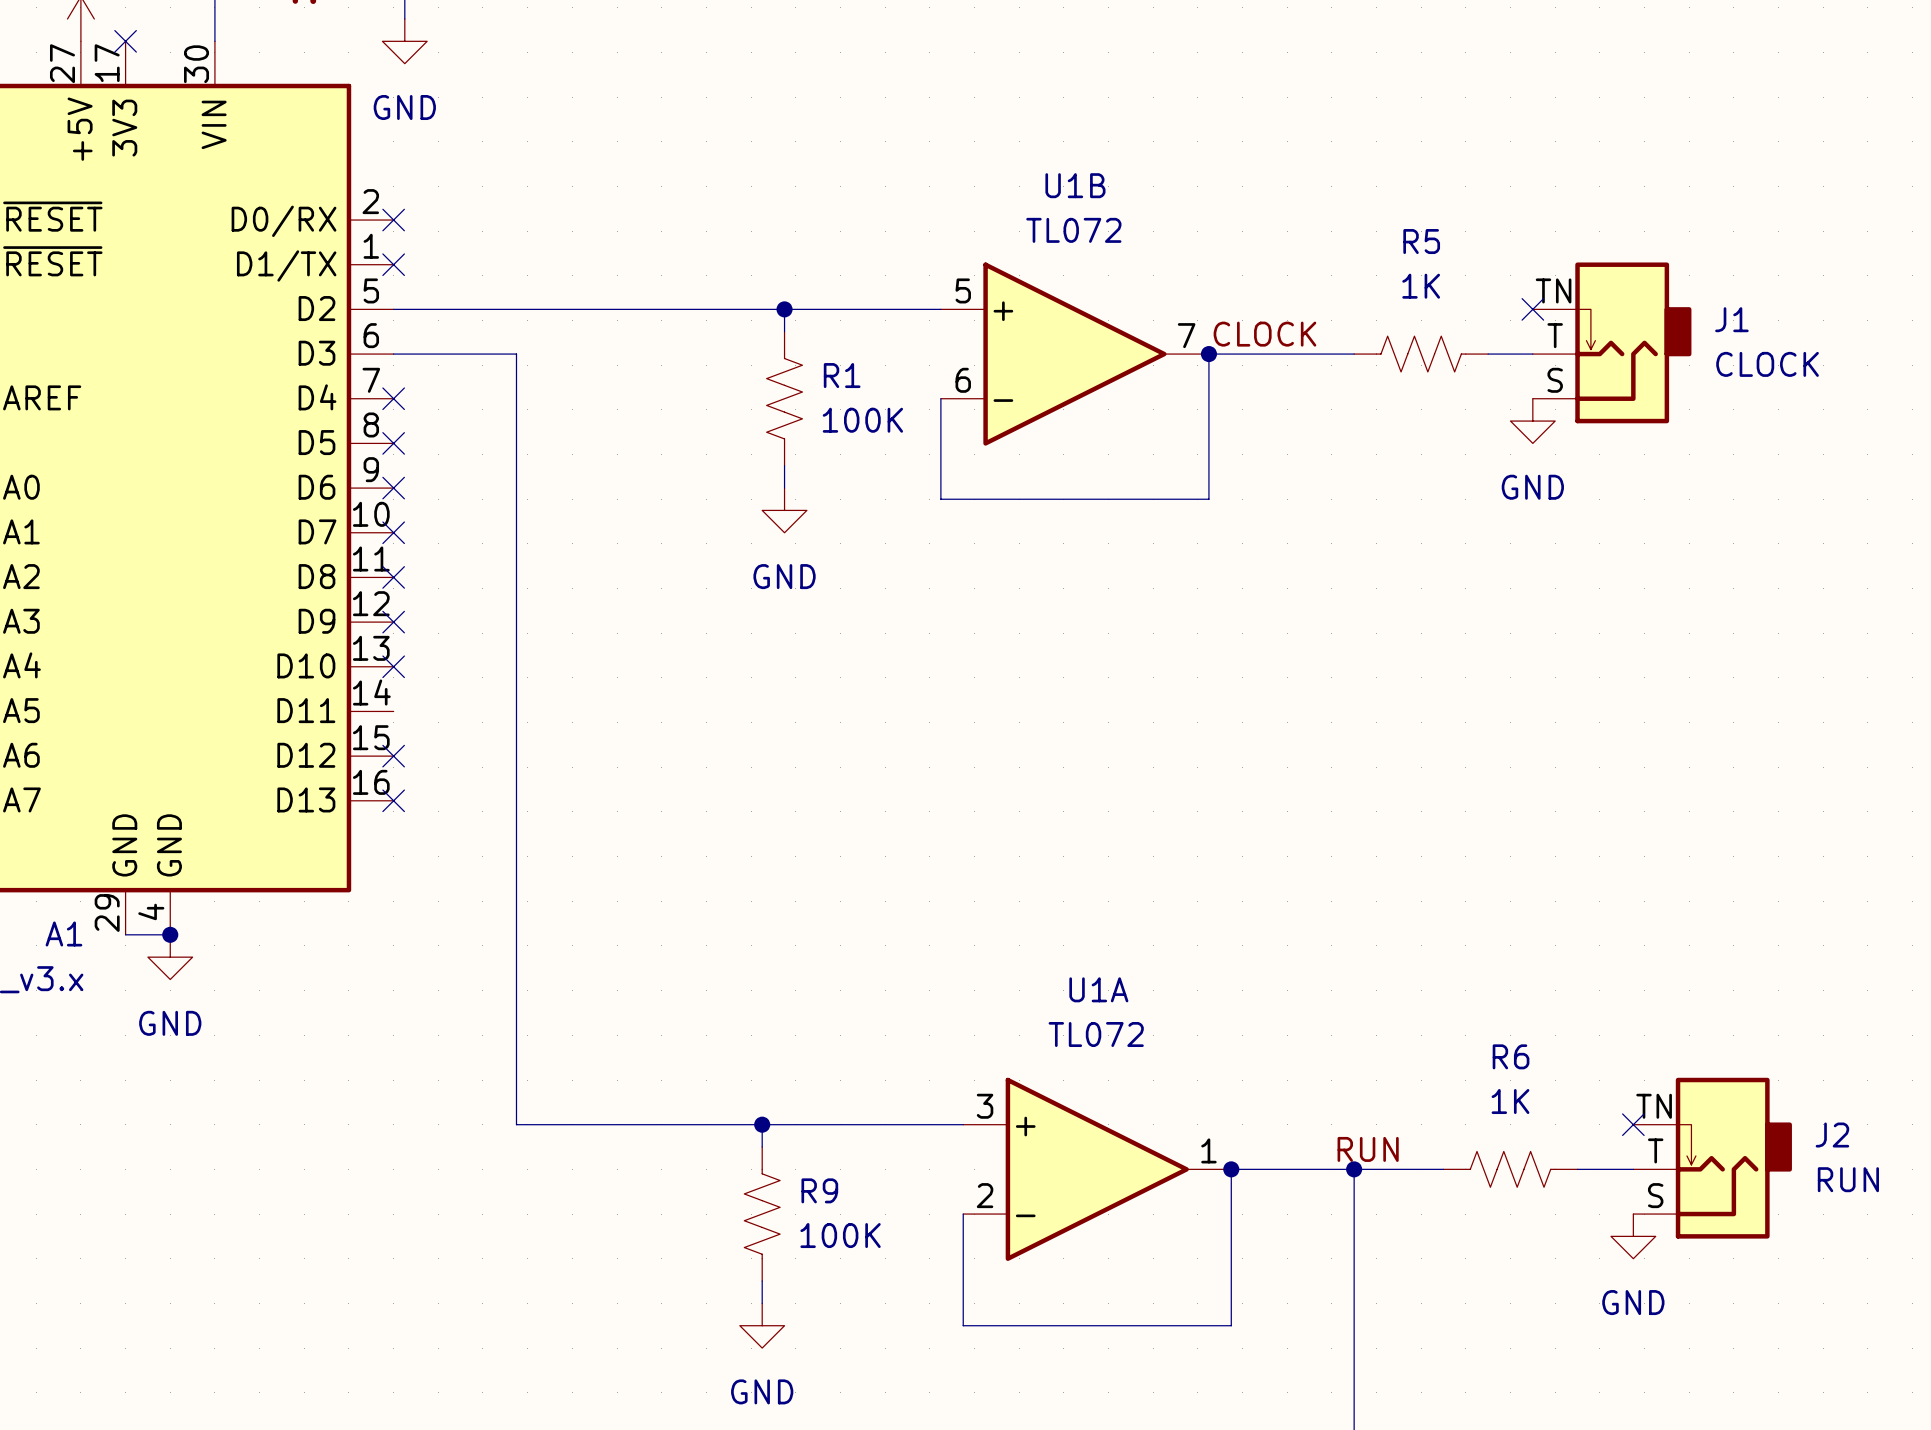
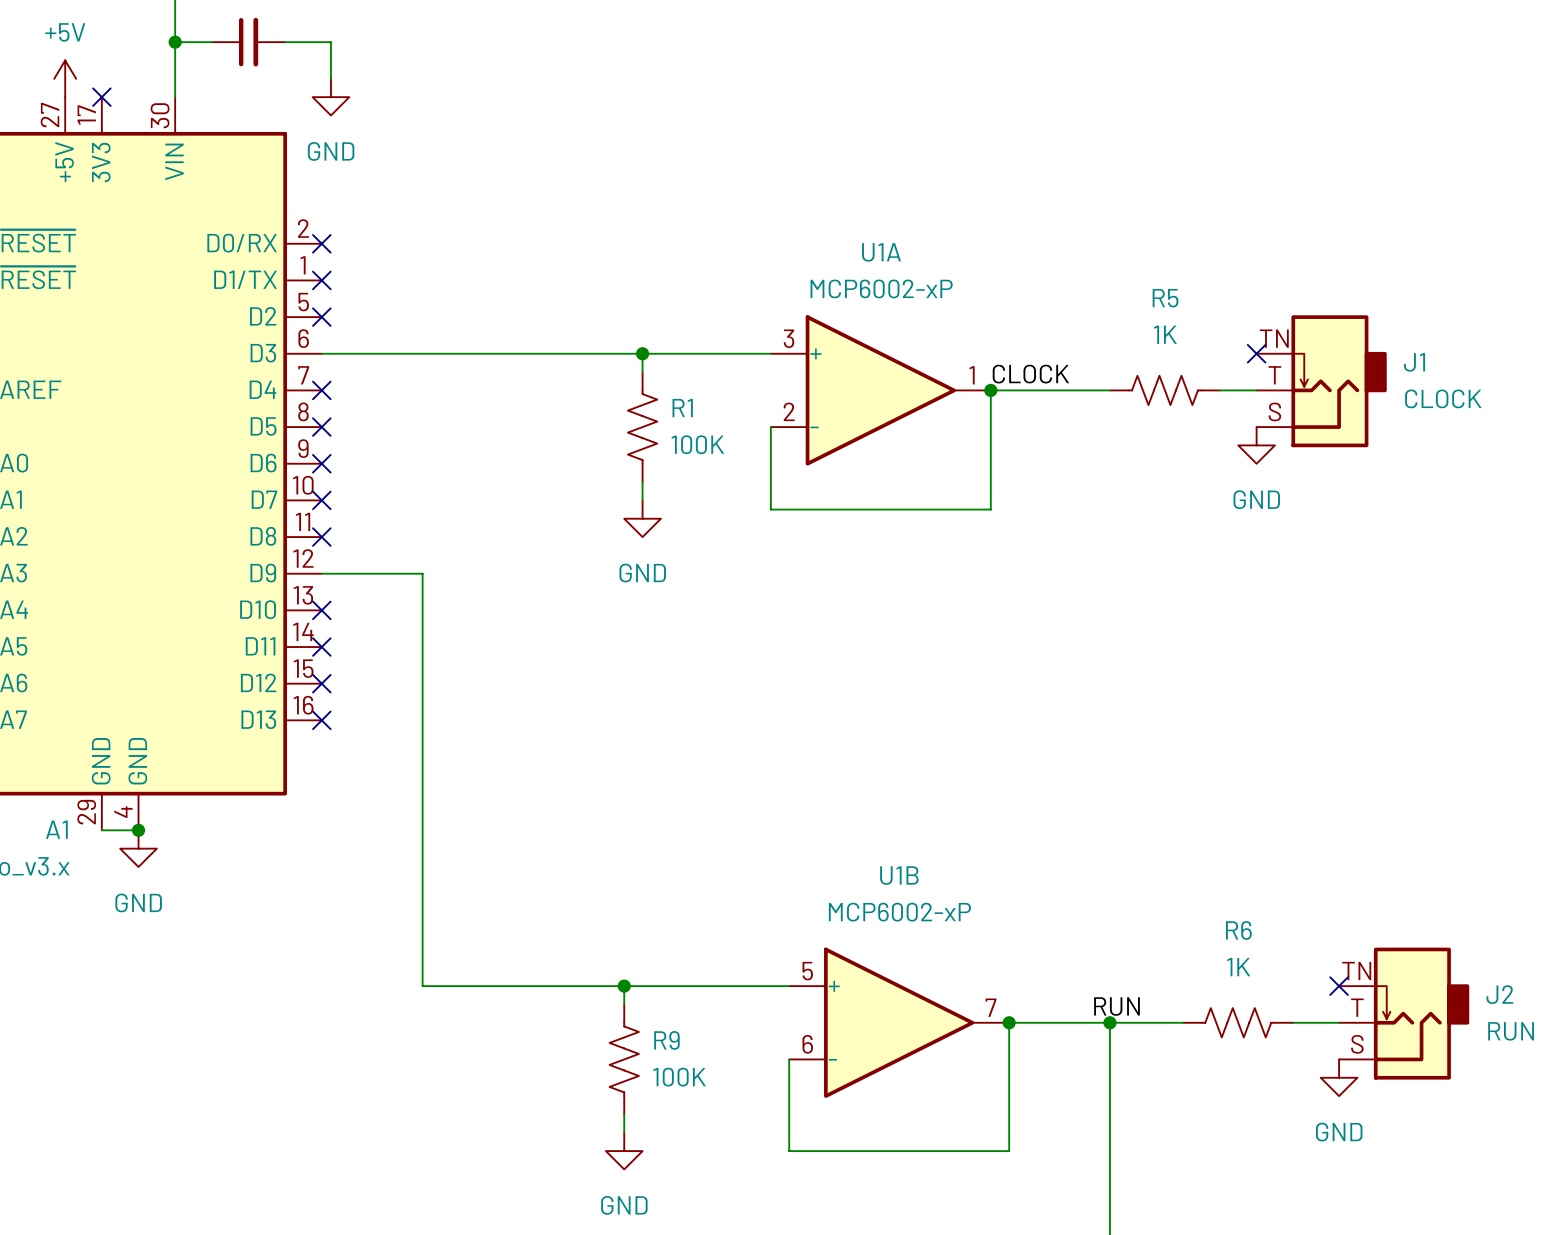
U1B name position: U1B (1075, 185) -> U1B (899, 875)
U1B value: TL072 (1073, 230) -> MCP6002-xP (899, 912)
wire: (393, 309) (940, 309) -> none
no-connect mark: none -> (321, 317)
wire: (784, 309) (784, 331) -> (642, 353) (642, 372)
junction position: (784, 309) -> (642, 353)
no-connect mark position: (1532, 309) -> (1256, 353)
label position: CLOCK (1264, 334) -> CLOCK (1030, 374)
J1 position: (1612, 342) -> (1321, 381)
wire: (516, 354) (516, 622) -> (321, 573) (422, 573)
wire: none -> (422, 353) (770, 353)
U1B position: (1074, 354) -> (899, 1022)
junction position: (1208, 354) -> (990, 390)
wire: (1354, 354) (1208, 354) (1208, 398) -> (1109, 390) (990, 390)
R5 position: (1421, 354) -> (1164, 390)
wire: (1488, 354) (1532, 354) -> (1219, 390) (1256, 390)
R1 position: (784, 398) -> (642, 427)
wire: (940, 398) (940, 443) -> none
power symbol position: GND (1532, 421) -> GND (1256, 445)
wire: (784, 465) (784, 488) -> (642, 482) (642, 500)
wire: (940, 499) (1208, 499) -> (770, 472) (770, 509) (990, 509) (990, 472)
power symbol position: GND (784, 510) -> GND (642, 518)
no-connect mark position: (393, 622) -> (321, 647)
U1A name position: U1A (1098, 989) -> U1A (881, 252)
U1A value: TL072 (1096, 1034) -> MCP6002-xP (881, 288)
U1A position: (1097, 1169) -> (880, 390)

